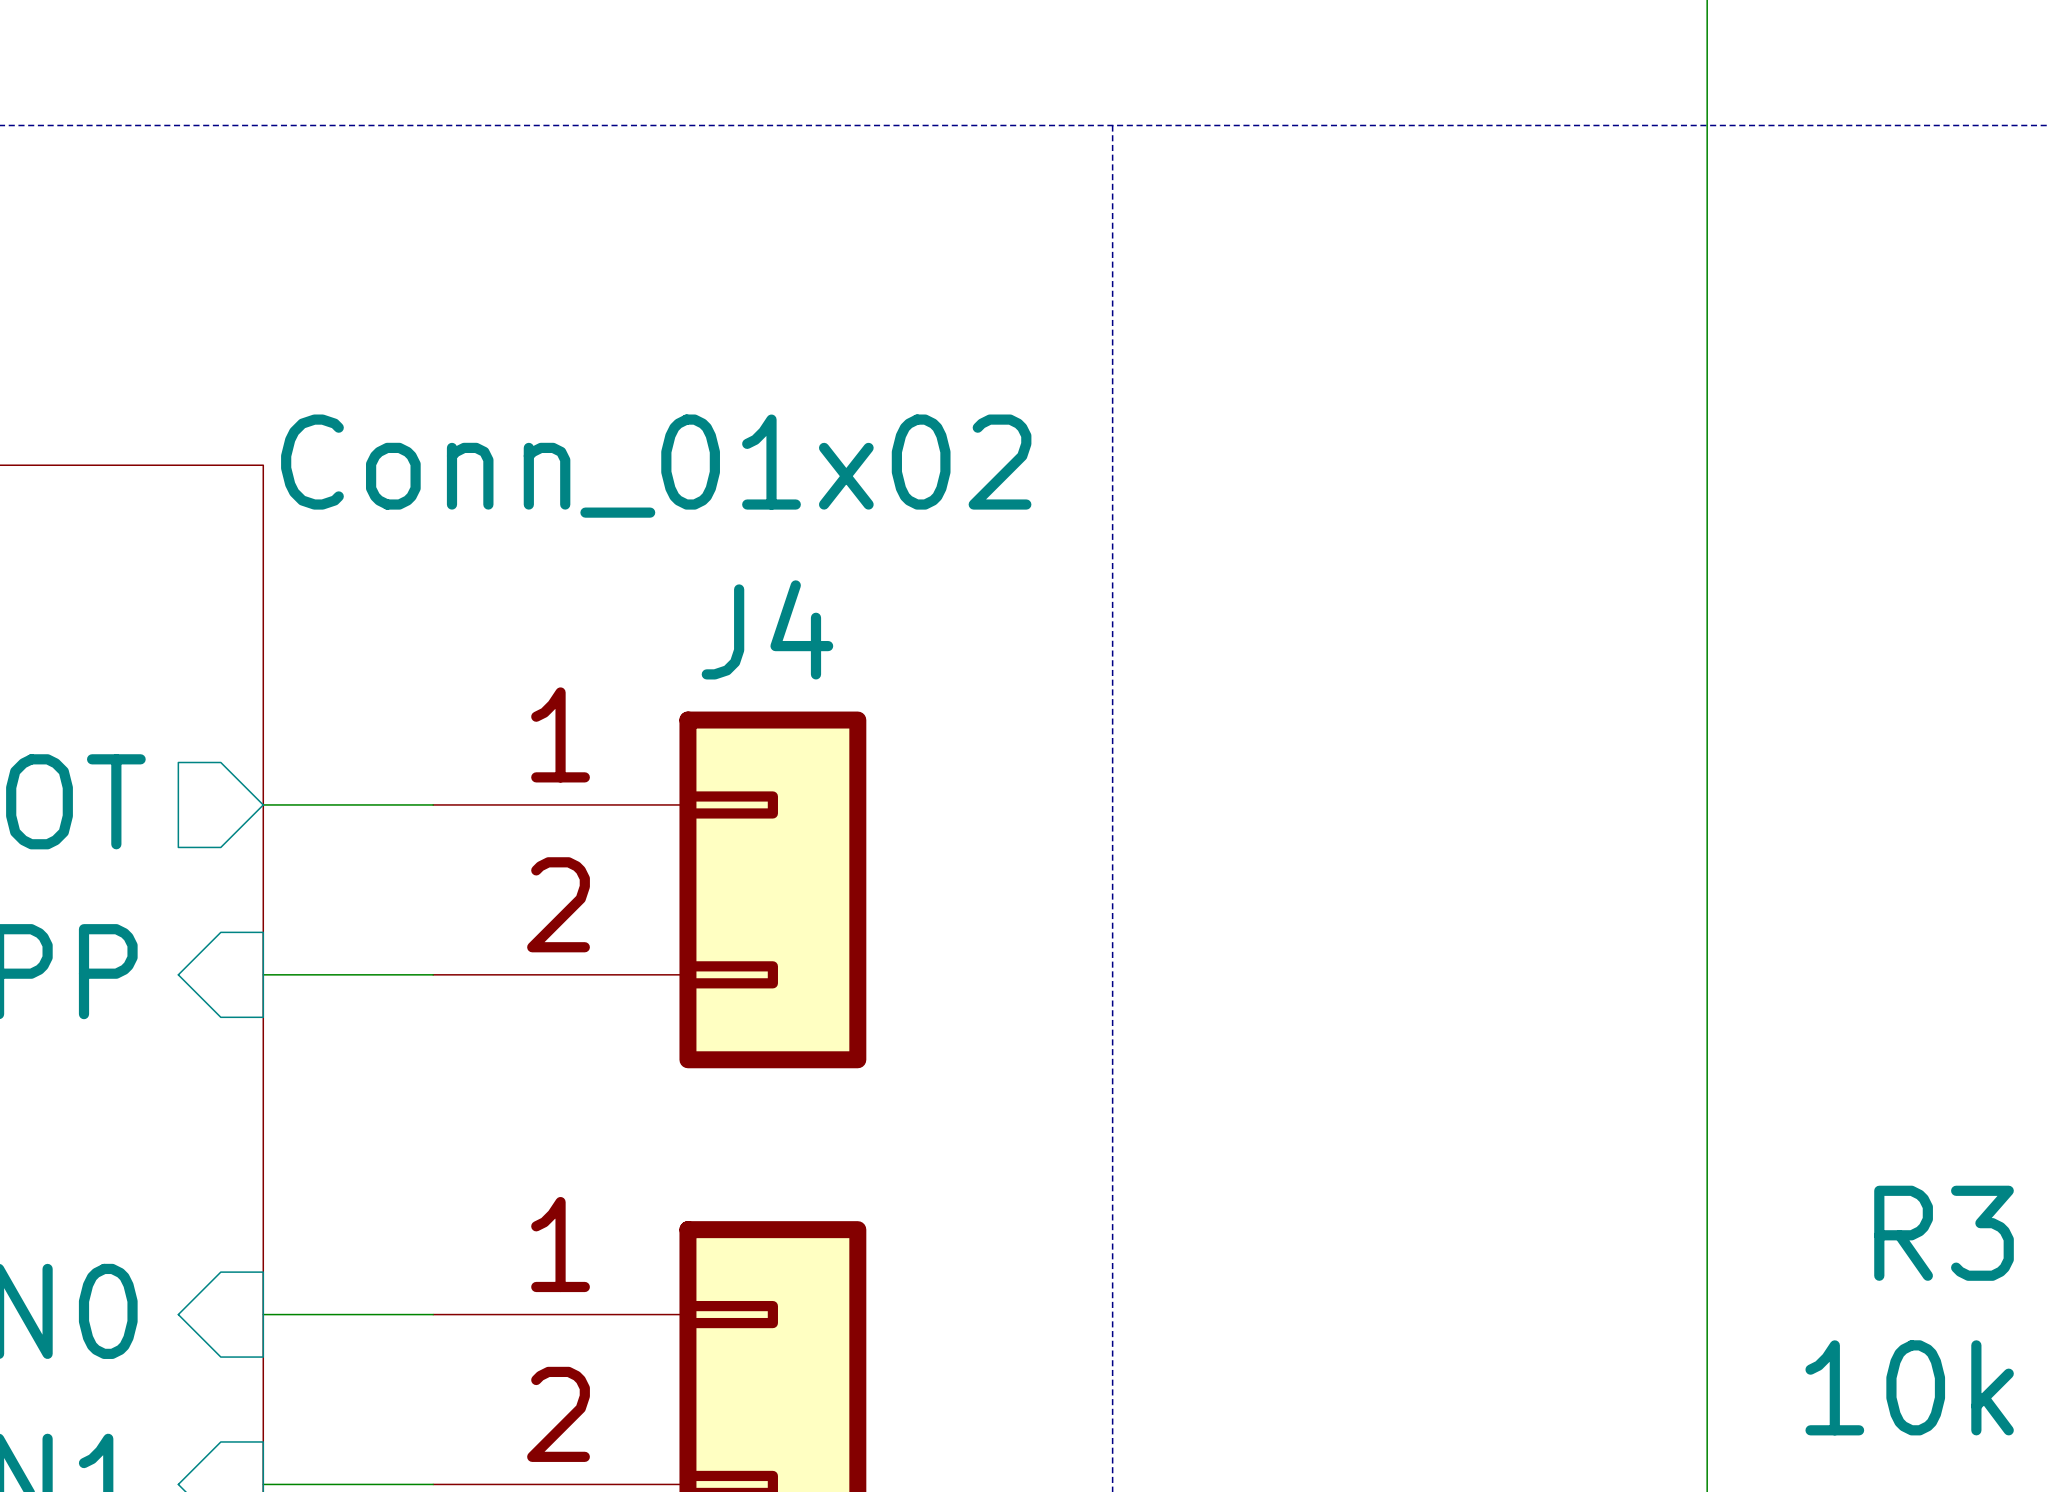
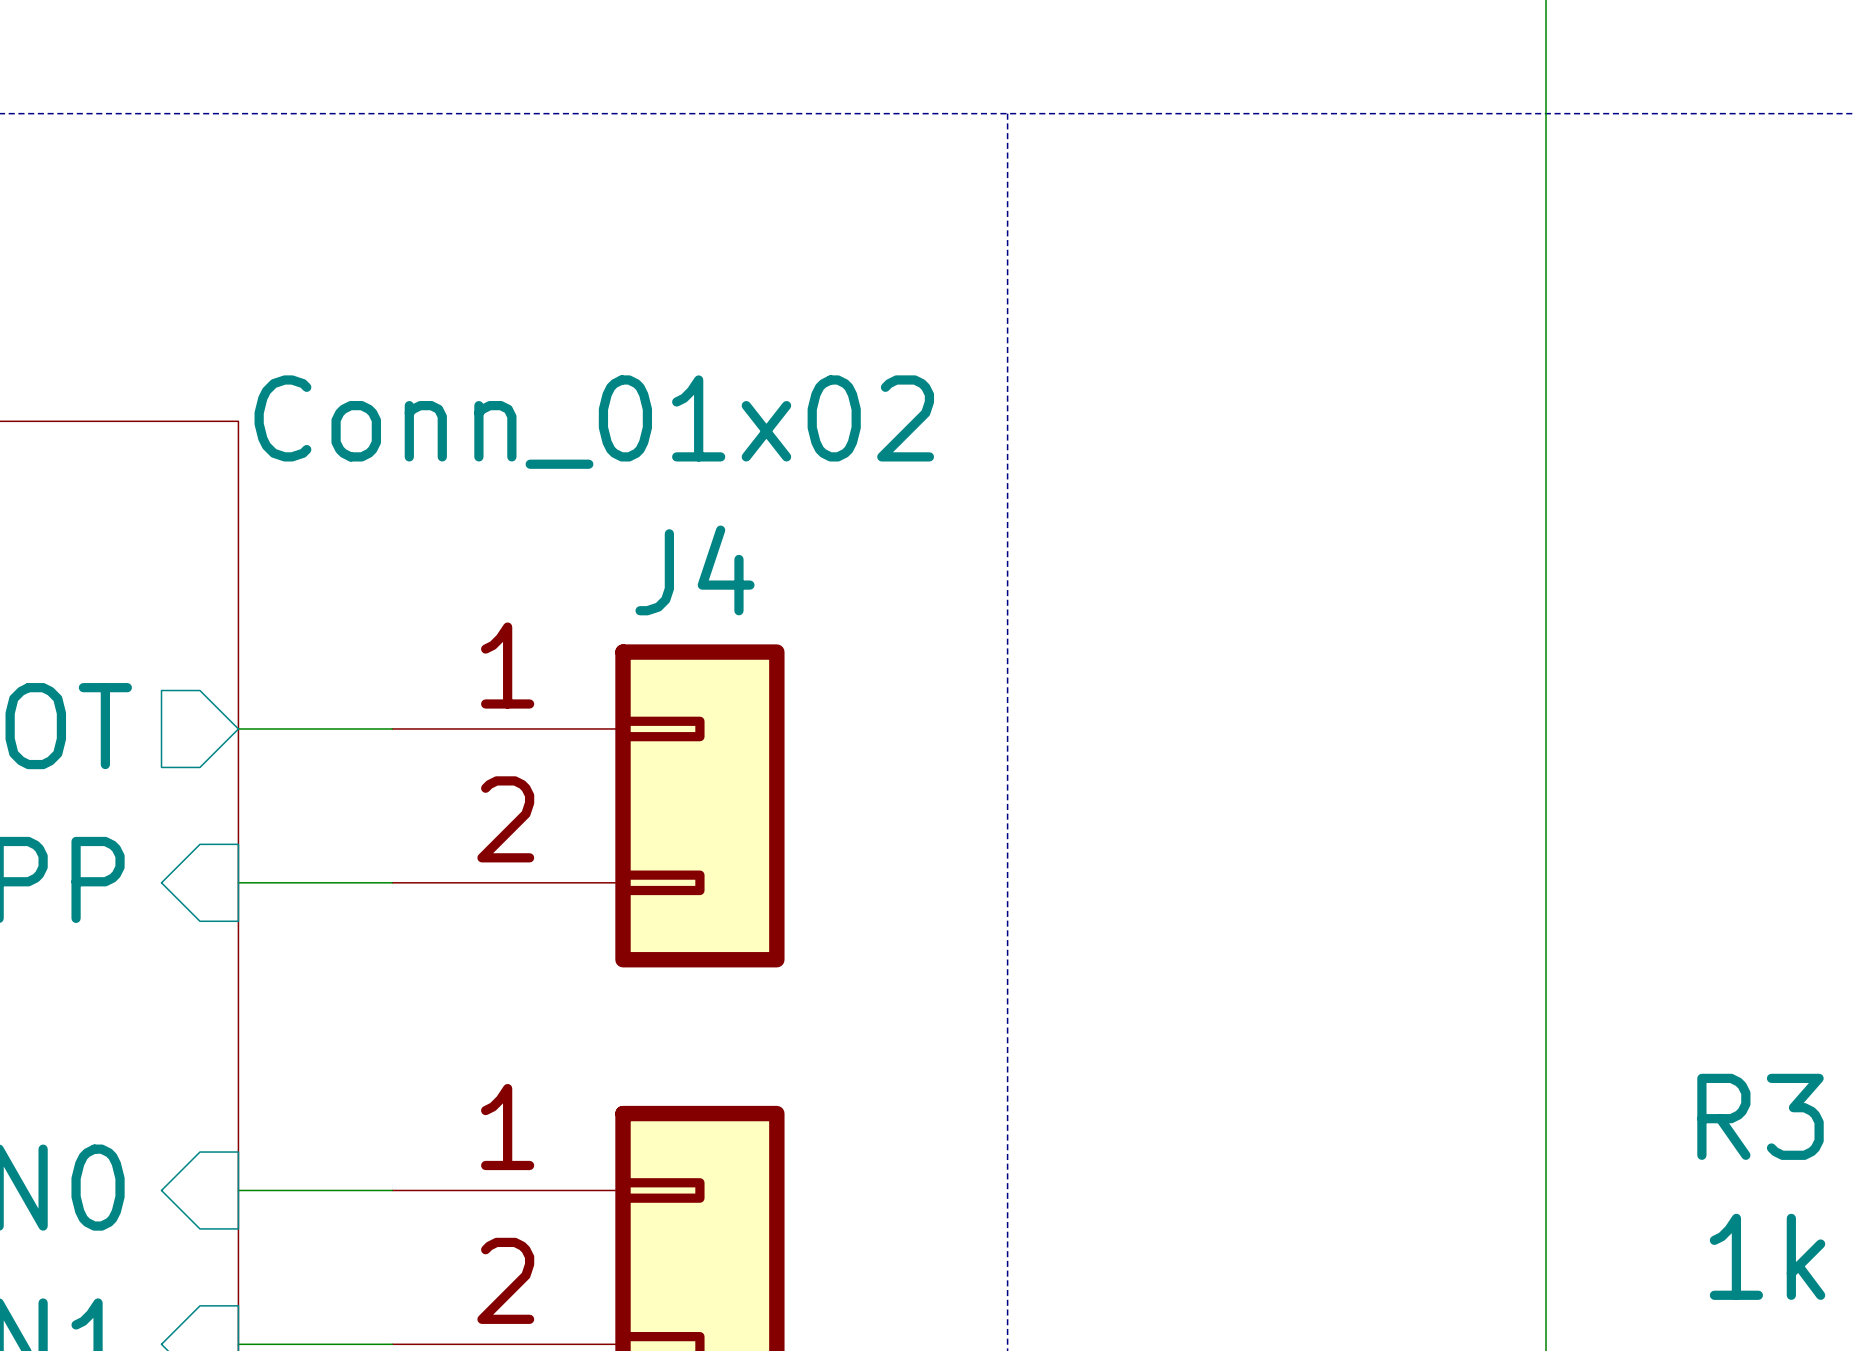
R3 value: 10k (1909, 1387) -> 1k (1767, 1256)

